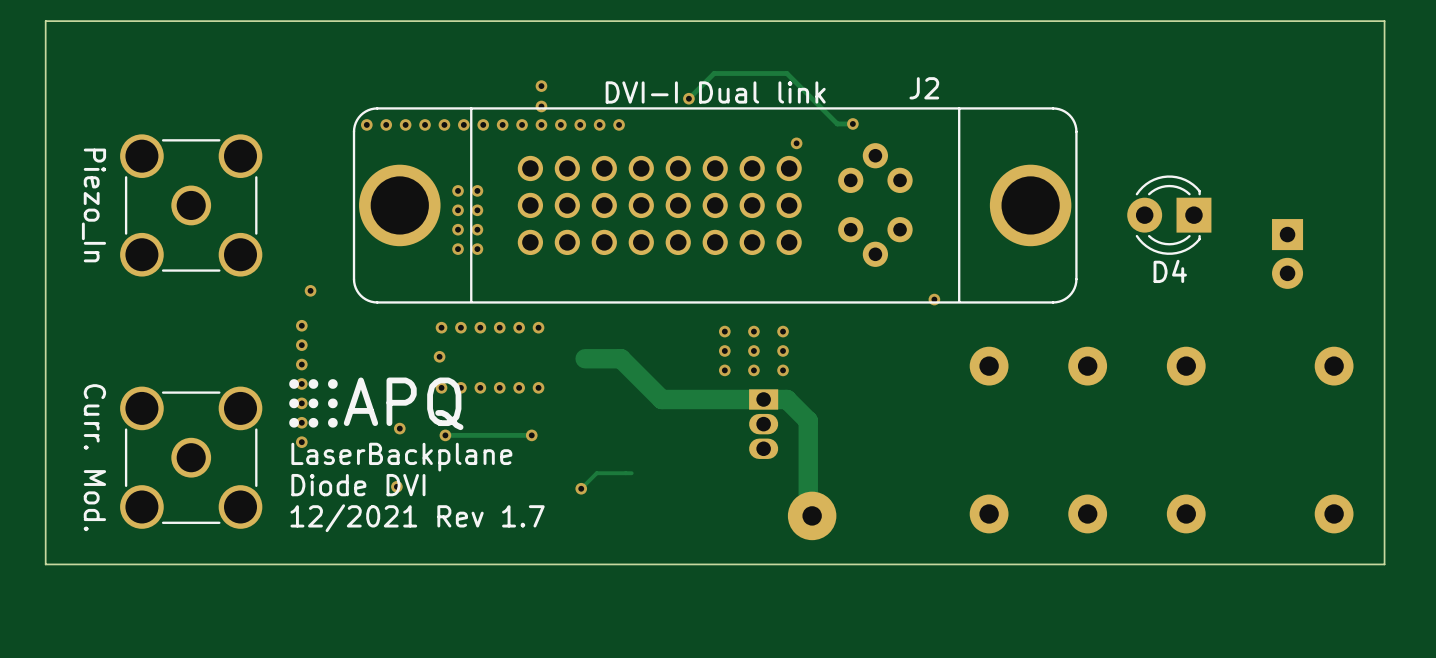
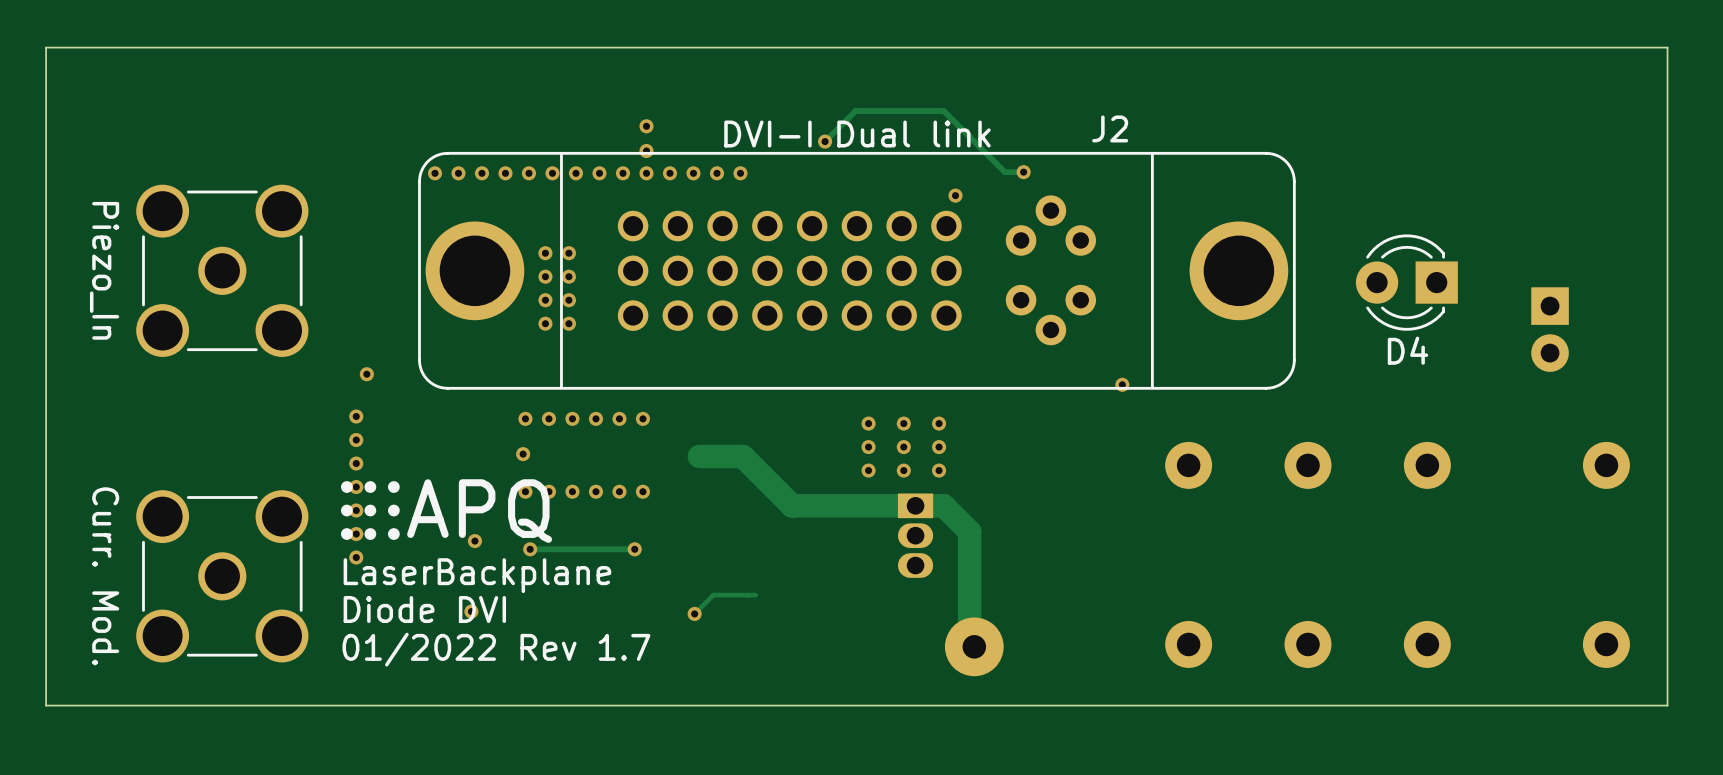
text: 12/2021 Rev 1.7 (417, 518) -> 01/2022 Rev 1.7 (496, 649)

